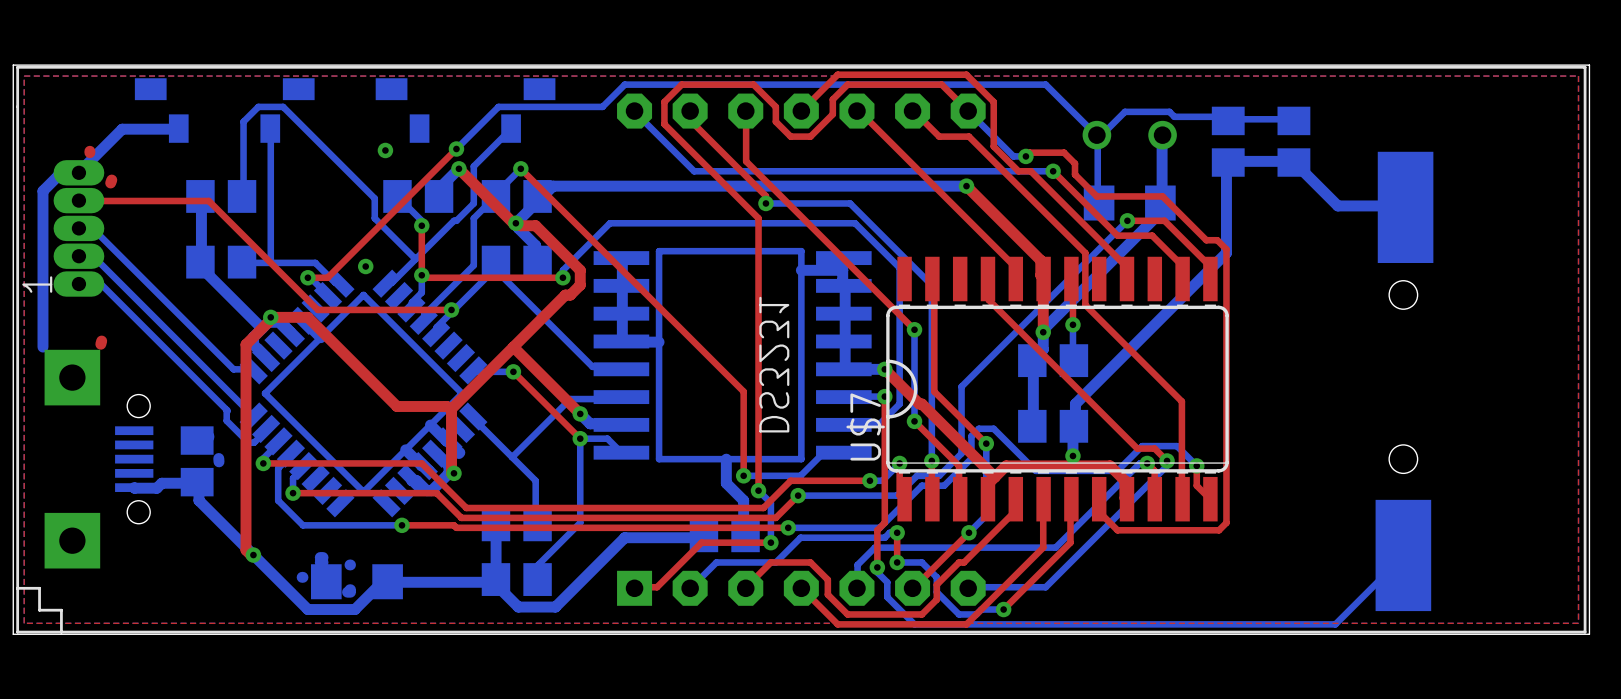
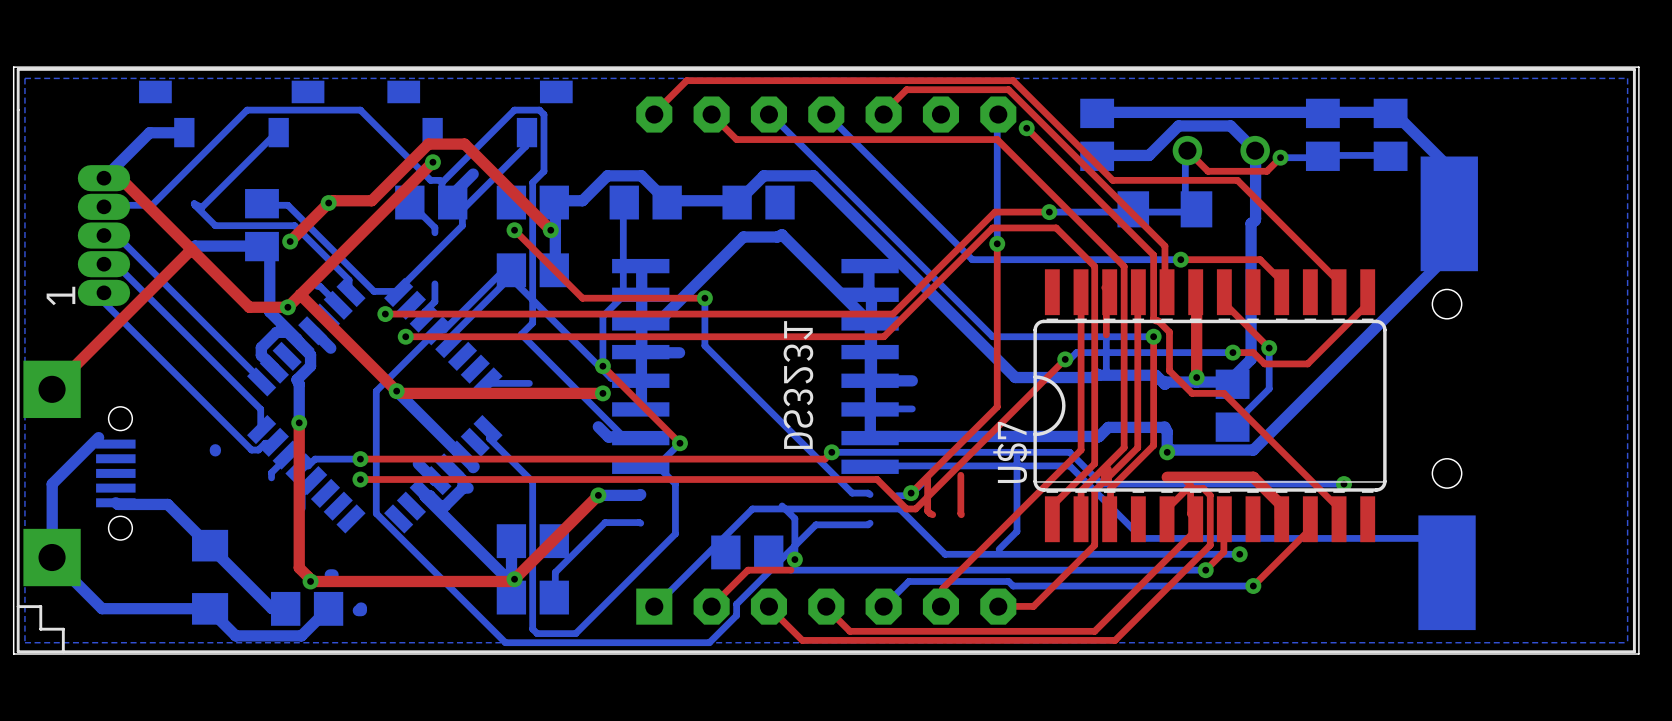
top zone outline: (24, 76) (1578, 76) (1578, 623) (24, 623) (24, 76) -> none
bottom track: (634, 111) (694, 171) (1053, 171) -> none
top track: none -> (654, 114) (686, 80) (1013, 80) (1112, 180) (1237, 180) (1337, 280) (1337, 291) (1339, 292)
top track: (690, 111) (691, 121) (765, 196) (765, 203) -> (711, 114) (736, 139) (997, 139) (1124, 266) (1124, 447) (1081, 490) (1081, 519)
bottom track: none -> (768, 114) (992, 336) (1153, 336)
top track: (745, 111) (746, 161) (914, 329) -> none
bottom track: none -> (826, 114) (972, 259) (1180, 259)
top track: (801, 111) (837, 74) (966, 74) (993, 101) (993, 146) (1018, 171) (1030, 171) (1124, 265) (1124, 277) (1127, 279) -> none
top track: (856, 111) (857, 109) (1013, 265) (1013, 277) (1015, 279) -> (883, 114) (906, 89) (1008, 89) (1164, 246) (1164, 291) (1167, 292)
top track: (912, 111) (939, 136) (968, 136) (1085, 252) (1085, 304) (1181, 401) (1182, 499) -> none
bottom track: (968, 111) (1013, 156) (1025, 156) -> (998, 114) (997, 243)
top track: (968, 111) (941, 84) (847, 84) (832, 99) (832, 114) (810, 136) (790, 136) (775, 121) (775, 106) (753, 84) (681, 84) (664, 101) (664, 124) (758, 218) (758, 490) -> none
bottom track: (1293, 120) (1293, 119) (1228, 119) (1228, 120) (1226, 116) (1174, 116) (1169, 111) (1124, 111) (1100, 136) (1096, 135) -> none
top track: none -> (1026, 128) (1153, 255) (1153, 318) (1169, 332) (1169, 370) (1192, 393) (1223, 393) (1337, 506) (1337, 518) (1339, 519)
via: none -> (1026, 128)
bottom track: (178, 128) (122, 129) (75, 176) (57, 176) (42, 191) (42, 347) -> (184, 132) (149, 132) (104, 178)
bottom track: (270, 128) (270, 262) -> (278, 132) (201, 207) (194, 203) (194, 205) (215, 225) (294, 225) (349, 280) (349, 291) (351, 292)
bottom track: (511, 128) (473, 166) (473, 203) (392, 282) (386, 283) -> (526, 132) (525, 146) (462, 209) (462, 225) (398, 289) (398, 292) (374, 291) (287, 205) (262, 205) (261, 203)
part: none -> (1097, 134)
part: none -> (1390, 134)
bottom track: (1096, 135) (1045, 84) (624, 84) (602, 106) (498, 106) (456, 149) -> none
bottom track: (1096, 135) (1099, 203) -> none
part position: (1129, 135) -> (1221, 150)
bottom track: (1162, 135) (1162, 200) (1159, 213) (1045, 327) (1043, 332) (1043, 349) (1032, 360) (1032, 426) -> none
part: (1228, 141) -> none
part position: (1293, 141) -> (1322, 134)
bottom track: none -> (1187, 150) (1185, 150) (1185, 209) (1191, 220) (1183, 212) (1049, 212)
top track: none -> (1187, 150) (1208, 171) (1266, 171) (1280, 157)
top track: (456, 149) (327, 277) (307, 277) -> none
via: (456, 149) -> none
via: (385, 150) -> none
top track: (89, 151) (89, 152) -> none
bottom track: none -> (1390, 156) (1323, 155) (1321, 157) (1280, 157)
via: none -> (1280, 157)
top track: (1025, 156) (1029, 152) (1064, 152) (1075, 163) (1075, 174) (1096, 196) (1162, 196) (1206, 240) (1217, 240) (1226, 249) (1226, 522) (1219, 530) (1117, 530) (1100, 512) (1099, 499) -> none
via: (1025, 156) -> none
top track: none -> (432, 162) (287, 307) (249, 307) (122, 180) (104, 180) (103, 178)
via: none -> (432, 162)
top track: (458, 168) (513, 223) (520, 225) (535, 225) (580, 270) (580, 285) (570, 295) (565, 295) (451, 408) -> none
via: (458, 168) -> none
bottom track: (520, 168) (473, 218) (473, 265) (424, 314) (423, 320) -> none
top track: (520, 168) (743, 391) (743, 475) -> none
via: (520, 168) -> none
top track: (1053, 171) (1117, 235) (1152, 235) (1181, 265) (1182, 279) -> none
via: (1053, 171) -> none
bottom track: none -> (442, 182) (439, 180) (430, 180) (360, 110) (247, 110) (151, 205) (104, 205) (103, 206)
bottom track: none -> (442, 182) (514, 110) (539, 110) (543, 114) (543, 171) (532, 182) (532, 323) (521, 334) (623, 436) (640, 437)
top track: (111, 180) (110, 183) -> none
bottom track: (966, 186) (553, 186) (543, 196) (537, 196) (538, 200) (515, 223) (535, 245) (535, 260) (537, 262) -> (1097, 156) (1149, 155) (1178, 125) (1230, 125) (1255, 150) (1255, 218) (1251, 223) (1251, 359) (1232, 377) (1232, 384) (1230, 382) (1164, 382) (1164, 384) (1155, 375) (1097, 374) (1092, 377) (1015, 377) (813, 175) (763, 175) (737, 202) (736, 200) (668, 200) (667, 202) (641, 175) (607, 175) (582, 200) (554, 202) (554, 270)
top track: (966, 186) (1040, 260) (1040, 275) (1043, 279) (1043, 332) -> none
via: (966, 186) -> none
bottom track: (200, 196) (201, 260) (198, 265) (262, 328) -> none
part: (221, 196) -> none
bottom track: (242, 196) (243, 121) (258, 106) (283, 106) (374, 198) (374, 218) (415, 259) -> none
via: none -> (328, 203)
bottom track: none -> (624, 202) (623, 295) (602, 316) (602, 366)
part: none -> (645, 202)
part: none -> (758, 202)
top track: (78, 200) (208, 200) (317, 309) (451, 309) -> none
bottom track: (765, 203) (850, 203) (931, 285) (931, 460) -> none
via: (765, 203) -> none
top track: none -> (1049, 212) (994, 212) (893, 314) (385, 314)
via: none -> (1049, 212)
bottom track: (1405, 207) (1337, 205) (1293, 161) (1228, 162) (1226, 163) (1226, 252) (1075, 404) (1072, 456) -> none
part: none -> (261, 225)
bottom track: (1127, 220) (961, 386) (961, 453) (939, 475) (916, 475) (897, 495) (798, 495) -> none
top track: (1127, 220) (1164, 220) (1209, 265) (1210, 279) -> none
via position: (1127, 220) -> (1180, 259)
top track: none -> (514, 230) (582, 298) (704, 298)
via: none -> (514, 230)
via: (515, 223) -> none
top track: none -> (550, 230) (464, 144) (428, 144) (371, 200) (333, 200) (328, 203) (290, 241)
via: none -> (550, 230)
top track: (421, 225) (421, 277) (562, 277) -> none
via: (421, 225) -> none
bottom track: (78, 228) (80, 230) (94, 230) (233, 369) (253, 370) -> (103, 235) (117, 237) (261, 381)
part position: (78, 228) -> (103, 235)
via: none -> (290, 241)
top track: none -> (997, 243) (997, 406) (911, 493)
via: none -> (997, 243)
bottom track: none -> (194, 246) (260, 246) (269, 250) (269, 311) (310, 354) (310, 366) (296, 379) (299, 384) (299, 422)
top track: none -> (191, 249) (52, 389)
bottom track: (659, 251) (801, 251) (801, 459) (659, 459) (659, 251) -> none
top track: none -> (1180, 259) (1260, 259) (1280, 280) (1281, 292)
bottom track: (78, 256) (80, 257) (94, 257) (253, 416) -> (104, 264) (115, 264) (260, 409) (261, 429)
part: (221, 262) -> none
bottom track: (242, 262) (315, 262) (335, 282) (340, 283) -> none
bottom track: none -> (511, 270) (503, 271) (444, 329) (437, 329) (376, 391) (376, 513) (505, 642) (709, 642) (736, 615) (736, 604) (815, 524) (868, 524) (870, 523)
via: (365, 266) -> none
bottom track: (801, 270) (842, 270) -> none
via: (421, 275) -> none
via: (307, 277) -> none
bottom track: (562, 277) (562, 270) (609, 223) (855, 223) (899, 267) (899, 404) (879, 423) (843, 424) -> none
via: (562, 277) -> none
top track: (932, 279) (934, 280) (934, 391) (986, 443) -> none
top track: (987, 279) (988, 300) (1137, 448) (1154, 448) (1167, 460) -> none
bottom track: (80, 282) (78, 284) (100, 284) (227, 410) -> none
top track: none -> (1138, 292) (1137, 447) (1094, 490) (1094, 545) (1033, 606) (998, 606)
top track: none -> (1195, 292) (1196, 377)
top track: none -> (1224, 292) (1226, 293) (1226, 305) (1269, 348)
top track: none -> (1367, 292) (1366, 305) (1307, 363) (1264, 363) (1253, 352) (1232, 352)
top track: none -> (300, 294) (396, 391) (401, 393) (602, 393)
bottom track: none -> (704, 298) (704, 345) (852, 493) (870, 494)
via: none -> (704, 298)
bottom track: (363, 294) (462, 393) (363, 491) (265, 393) (363, 294) -> none
via: none -> (287, 307)
via: none -> (385, 314)
via: (451, 309) -> none
via: (270, 317) -> none
via: (1072, 324) -> none
top track: none -> (405, 336) (883, 336) (992, 227) (1056, 227) (1094, 266) (1094, 463) (1053, 504) (1052, 519)
via: none -> (405, 336)
top track: none -> (1153, 336) (1153, 445) (1110, 488) (1109, 519)
via: none -> (1153, 336)
bottom track: (914, 329) (914, 421) -> none
via: (914, 329) -> none
via position: (1043, 332) -> (1065, 359)
bottom track: none -> (1269, 348) (1269, 388) (1232, 427)
via: none -> (1269, 348)
top track: (101, 341) (100, 344) -> none
bottom track: none -> (1232, 352) (1076, 352) (1069, 359) (1065, 359)
via: none -> (1232, 352)
top track: (513, 347) (580, 413) -> none
top track: none -> (1065, 359) (915, 508) (906, 508) (877, 479) (360, 479)
top track: none -> (602, 366) (679, 443)
via: none -> (602, 366)
part: (1053, 360) -> none
via: none -> (1196, 377)
top track: (884, 369) (994, 477) -> none
via: (884, 369) -> none
top track: (513, 371) (580, 438) -> none
via: (513, 371) -> none
bottom track: none -> (396, 391) (443, 438)
via: none -> (396, 391)
via: none -> (602, 393)
U$7 position: (1057, 389) -> (1210, 405)
part: none -> (1232, 405)
top track: (884, 396) (884, 522) (877, 530) (877, 567) -> none
via: (884, 396) -> none
bottom track: (621, 397) (619, 399) (570, 399) (512, 457) -> (640, 408) (640, 322) (659, 320) (743, 237) (777, 237) (781, 234) (870, 322) (870, 437) (1097, 437) (1108, 427) (1164, 427) (1167, 431) (1167, 452) (1171, 450) (1253, 450) (1457, 246) (1457, 175) (1396, 114) (1389, 112) (1097, 113)
top track: (451, 408) (451, 473) (453, 473) -> none
top track: (451, 408) (446, 406) (397, 406) (307, 317) (270, 317) (246, 344) (246, 550) (253, 555) -> none
bottom track: (226, 409) (226, 420) (248, 442) (254, 442) (266, 428) -> (103, 292) (104, 302) (251, 450) (258, 450) (265, 443) (274, 442)
top track: none -> (299, 422) (299, 567) (310, 581) (510, 581) (514, 579) (598, 495)
via: none -> (299, 422)
via: (580, 413) -> none
bottom track: (473, 416) (535, 480) (535, 522) (537, 524) -> (488, 429) (489, 429) (489, 438) (532, 481) (532, 629) (537, 633) (575, 633) (675, 533) (675, 484) (657, 465) (640, 465) (659, 463) (679, 443)
top track: (914, 421) (959, 465) (960, 499) -> none
via: (914, 421) -> none
bottom track: none -> (98, 437) (52, 484) (52, 557) (102, 608) (210, 608) (235, 635) (301, 635) (328, 608)
part: (1053, 426) -> none
via: none -> (679, 443)
via: (580, 438) -> none
bottom track: none -> (831, 452) (1069, 452) (1101, 484) (1343, 484)
top track: none -> (831, 452) (825, 459) (360, 459)
via: none -> (831, 452)
via: none -> (1167, 452)
via: (986, 443) -> none
via: none -> (360, 459)
bottom track: (621, 452) (607, 438) (580, 438) (580, 522) (538, 564) (537, 579) -> none
bottom track: (843, 452) (822, 453) (800, 475) (743, 475) -> (870, 465) (1069, 465) (1142, 538) (1434, 538) (1456, 559)
bottom track: (290, 453) (278, 468) (278, 500) (302, 525) (401, 525) -> (299, 467) (301, 465) (308, 465) (315, 459) (360, 459)
via: (1072, 456) -> none
bottom track: (218, 458) (219, 461) -> none
part position: (98, 459) -> (79, 473)
bottom track: (726, 459) (726, 483) (743, 500) (743, 535) (745, 535) -> none
via: (931, 460) -> none
bottom track: (1167, 460) (1167, 465) (1045, 587) (968, 588) -> none
via: (1167, 460) -> none
part: (197, 461) -> none
top track: none -> (1167, 477) (1253, 477) (1280, 504) (1281, 519)
top track: (263, 463) (421, 463) (466, 508) (763, 508) (790, 480) (869, 480) -> none
via: (263, 463) -> none
via: (899, 463) -> none
bottom track: (1147, 463) (1139, 463) (1055, 547) (874, 547) (857, 564) (856, 588) -> (1253, 586) (1013, 586) (1008, 581) (908, 581) (883, 606)
via: (1147, 463) -> none
via: none -> (360, 479)
bottom track: (1196, 465) (1176, 446) (1142, 446) (1117, 470) (1035, 470) (993, 428) (978, 428) (971, 436) (971, 458) (944, 485) (921, 485) (879, 527) (788, 527) -> none
top track: (1196, 465) (1196, 485) (1210, 499) -> none
via: (1196, 465) -> none
via: none -> (1343, 484)
via: (453, 473) -> none
via: (743, 475) -> none
bottom track: none -> (424, 493) (426, 497) (510, 581)
bottom track: none -> (640, 494) (598, 495)
via: none -> (598, 495)
via position: (869, 480) -> (911, 493)
bottom track: none -> (115, 502) (117, 504) (167, 504) (272, 608) (285, 608)
bottom track: (134, 487) (156, 488) (161, 483) (197, 482) (198, 500) (307, 609) (354, 609) (382, 582) (491, 582) (495, 579) (496, 584) (518, 607) (555, 607) (624, 537) (701, 537) (703, 535) -> none
via: (758, 490) -> none
top track: (293, 493) (436, 493) (461, 517) (775, 517) (798, 495) -> none
via: (293, 493) -> none
via: (798, 495) -> none
top track: (987, 499) (988, 483) (1006, 465) (1110, 465) (1124, 480) (1124, 498) (1127, 499) -> none
top track: (1015, 499) (1013, 500) (1013, 512) (964, 562) (959, 562) (936, 584) (936, 599) (921, 614) (847, 614) (827, 594) (827, 579) (810, 562) (770, 562) (745, 588) -> (1167, 519) (1167, 508) (1187, 488) (1203, 488) (1210, 495) (1210, 545) (1115, 640) (802, 640) (768, 606)
top track: (1043, 499) (1043, 547) (966, 624) (837, 624) (801, 588) -> (1195, 519) (1194, 531) (1094, 631) (849, 631) (826, 606)
top track: (1071, 499) (1070, 542) (1003, 609) -> none
top track: none -> (1224, 519) (1223, 552) (1205, 570)
top track: none -> (1310, 519) (1309, 529) (1253, 586)
bottom track: none -> (640, 523) (605, 522) (555, 572) (554, 608)
top track: (401, 525) (453, 525) (456, 527) (788, 527) -> none
via: (401, 525) -> none
via: (788, 527) -> none
bottom track: (897, 532) (889, 532) (884, 537) (800, 537) (775, 562) (716, 562) (690, 588) -> none
top track: (897, 532) (897, 562) -> none
via: (897, 532) -> none
top track: (968, 532) (912, 588) -> (1081, 292) (1081, 450) (942, 588) (942, 606) (940, 606)
via: (968, 532) -> none
bottom track: none -> (1239, 554) (945, 554) (899, 508) (752, 508) (654, 606)
via: none -> (1239, 554)
top track: (770, 542) (701, 542) (657, 587) (634, 588) -> none
bottom track: none -> (791, 570) (1205, 570)
top track: none -> (791, 570) (747, 570) (711, 606)
via: none -> (1205, 570)
via: (253, 555) -> none
bottom track: (1403, 555) (1335, 624) (914, 624) (887, 597) (887, 582) (877, 572) (877, 567) -> none
via: none -> (514, 579)
bottom track: (897, 562) (921, 562) (936, 577) (936, 592) (959, 614) (976, 614) (981, 609) (1003, 609) -> none
via: (897, 562) -> none
via: none -> (310, 581)
bottom track: (349, 564) (350, 564) -> none
via: (877, 567) -> none
via: none -> (1253, 586)
bottom track: (302, 577) (302, 577) -> none
part rotation: 0° (356, 581) -> 90° clockwise (210, 577)
part position: (356, 581) -> (210, 577)
part: none -> (307, 608)
via: (1003, 609) -> none

